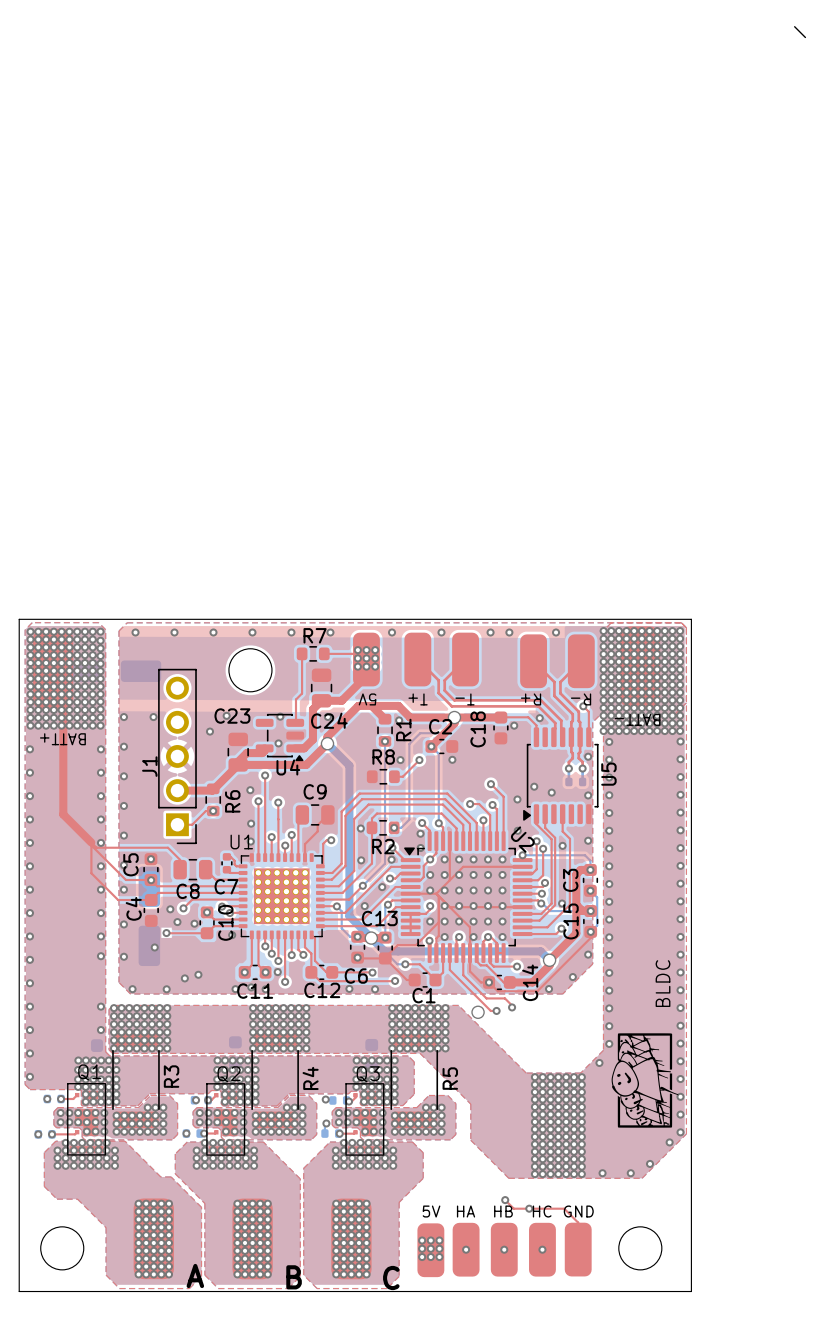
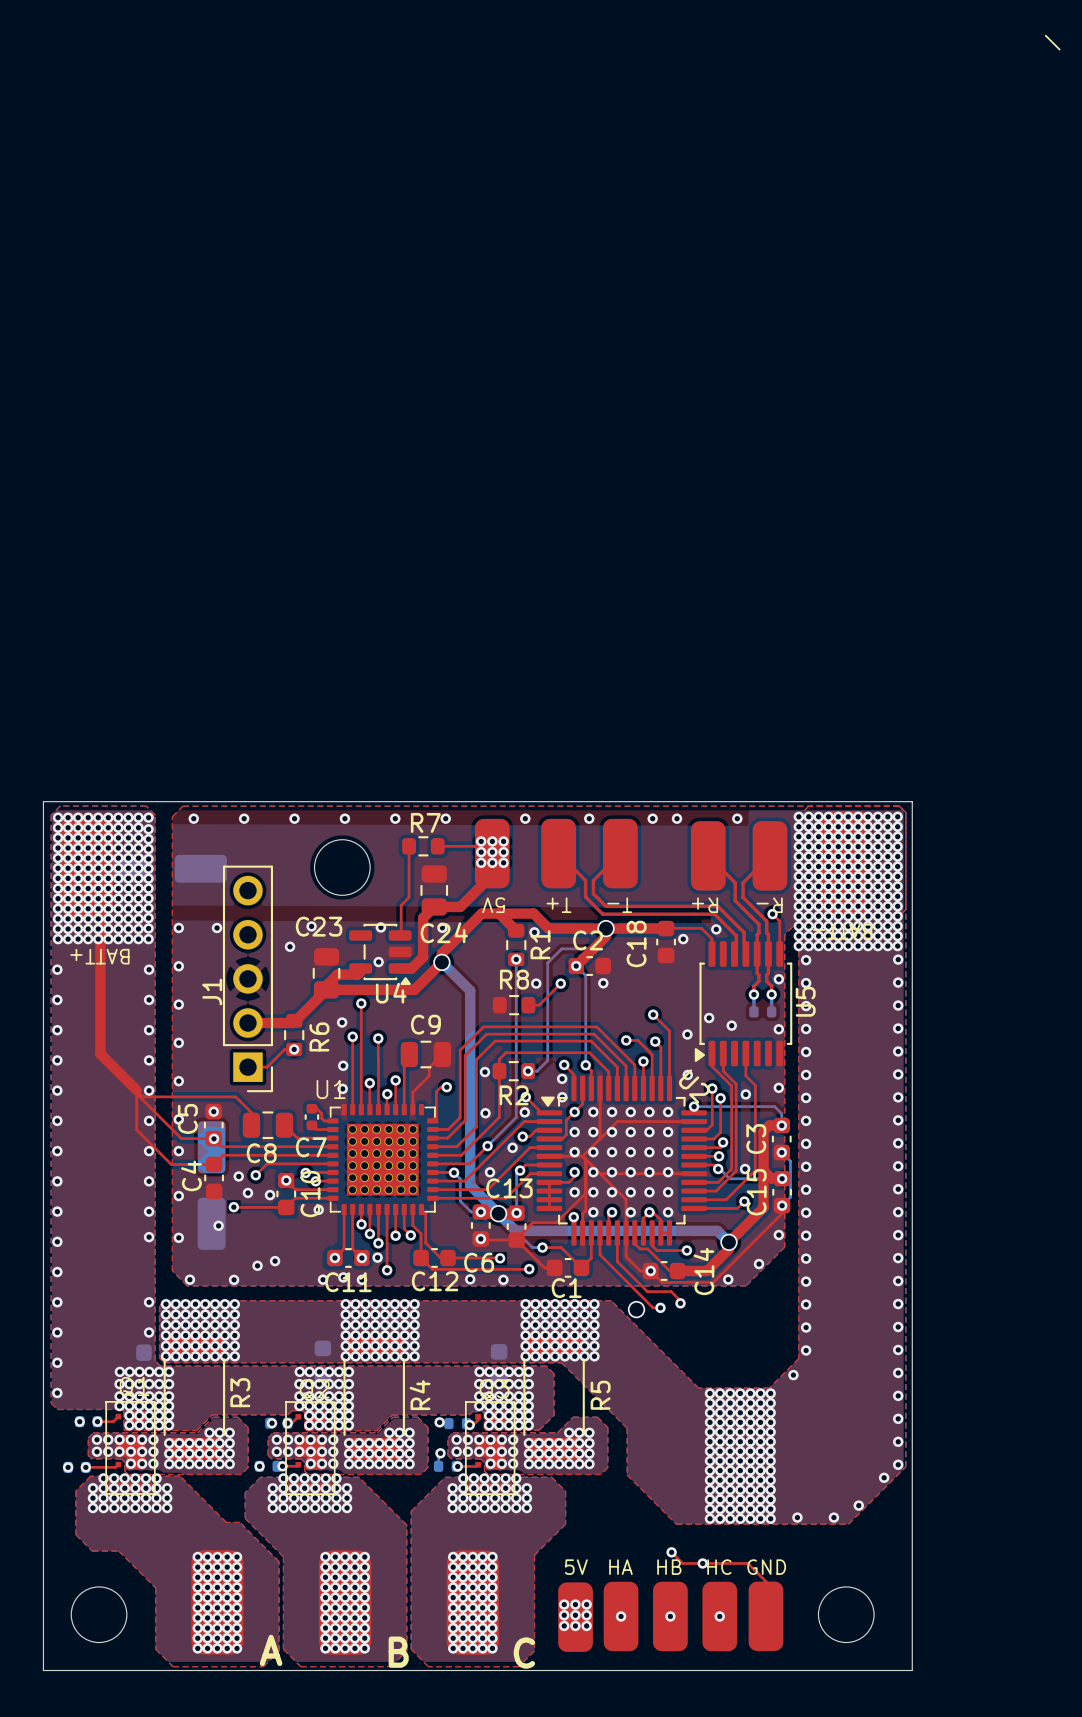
text: BLDC (663, 983) -> none
drawing: [611, 1033, 679, 1128] -> none

